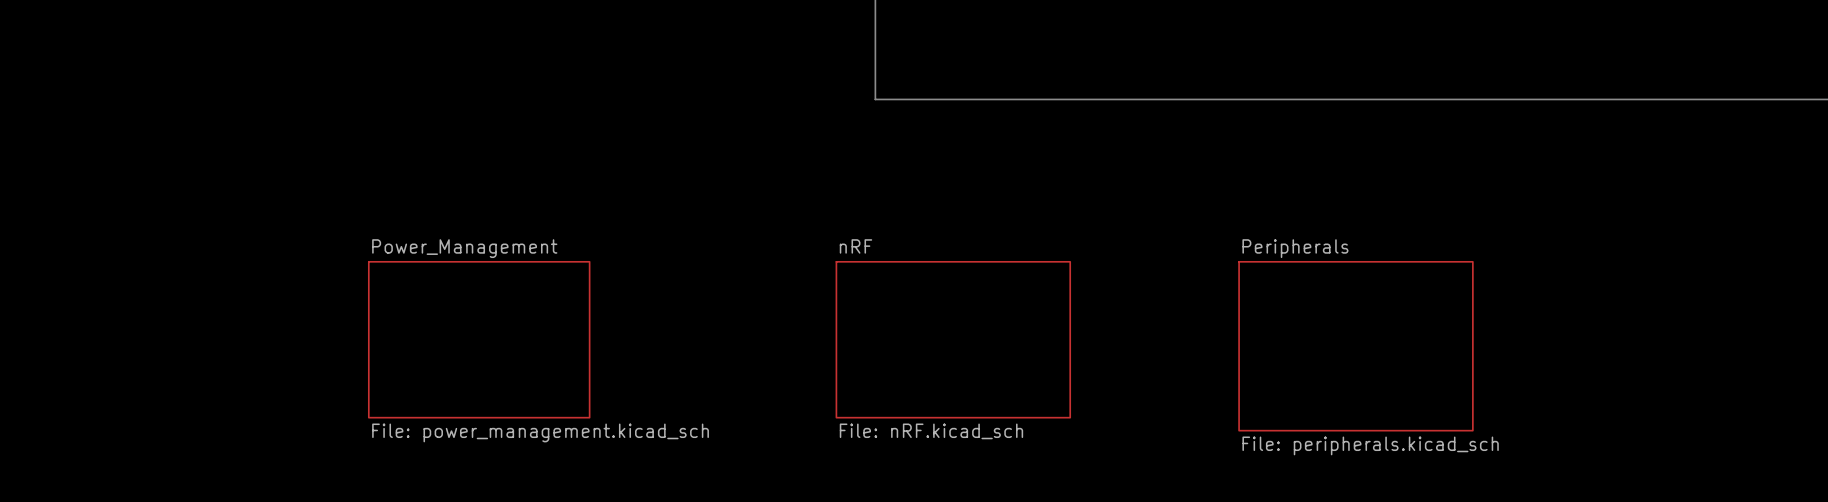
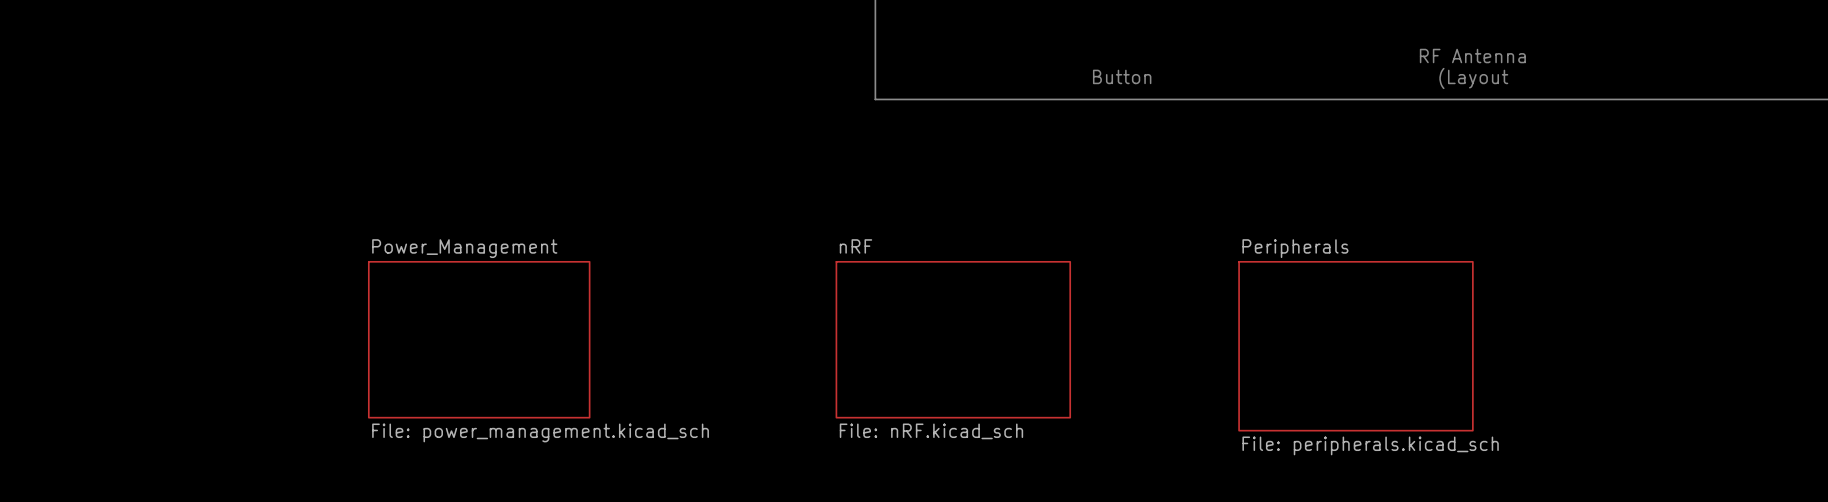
text: none -> RF Antenna (1472, 56)
text: none -> Button (1122, 76)
text: none -> (Layout (1473, 78)

